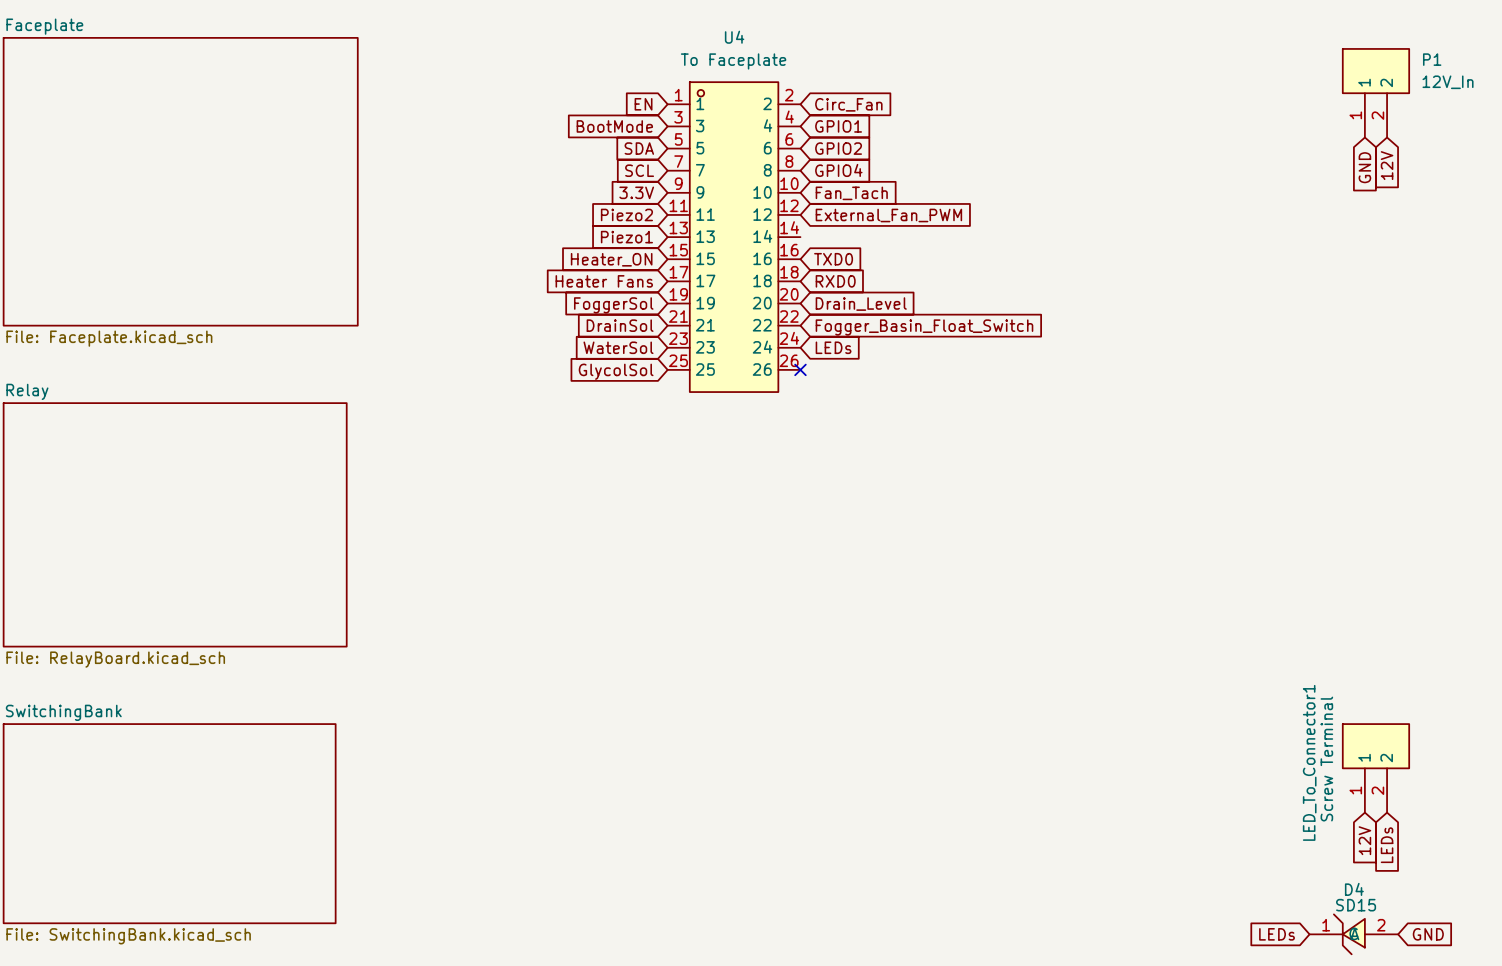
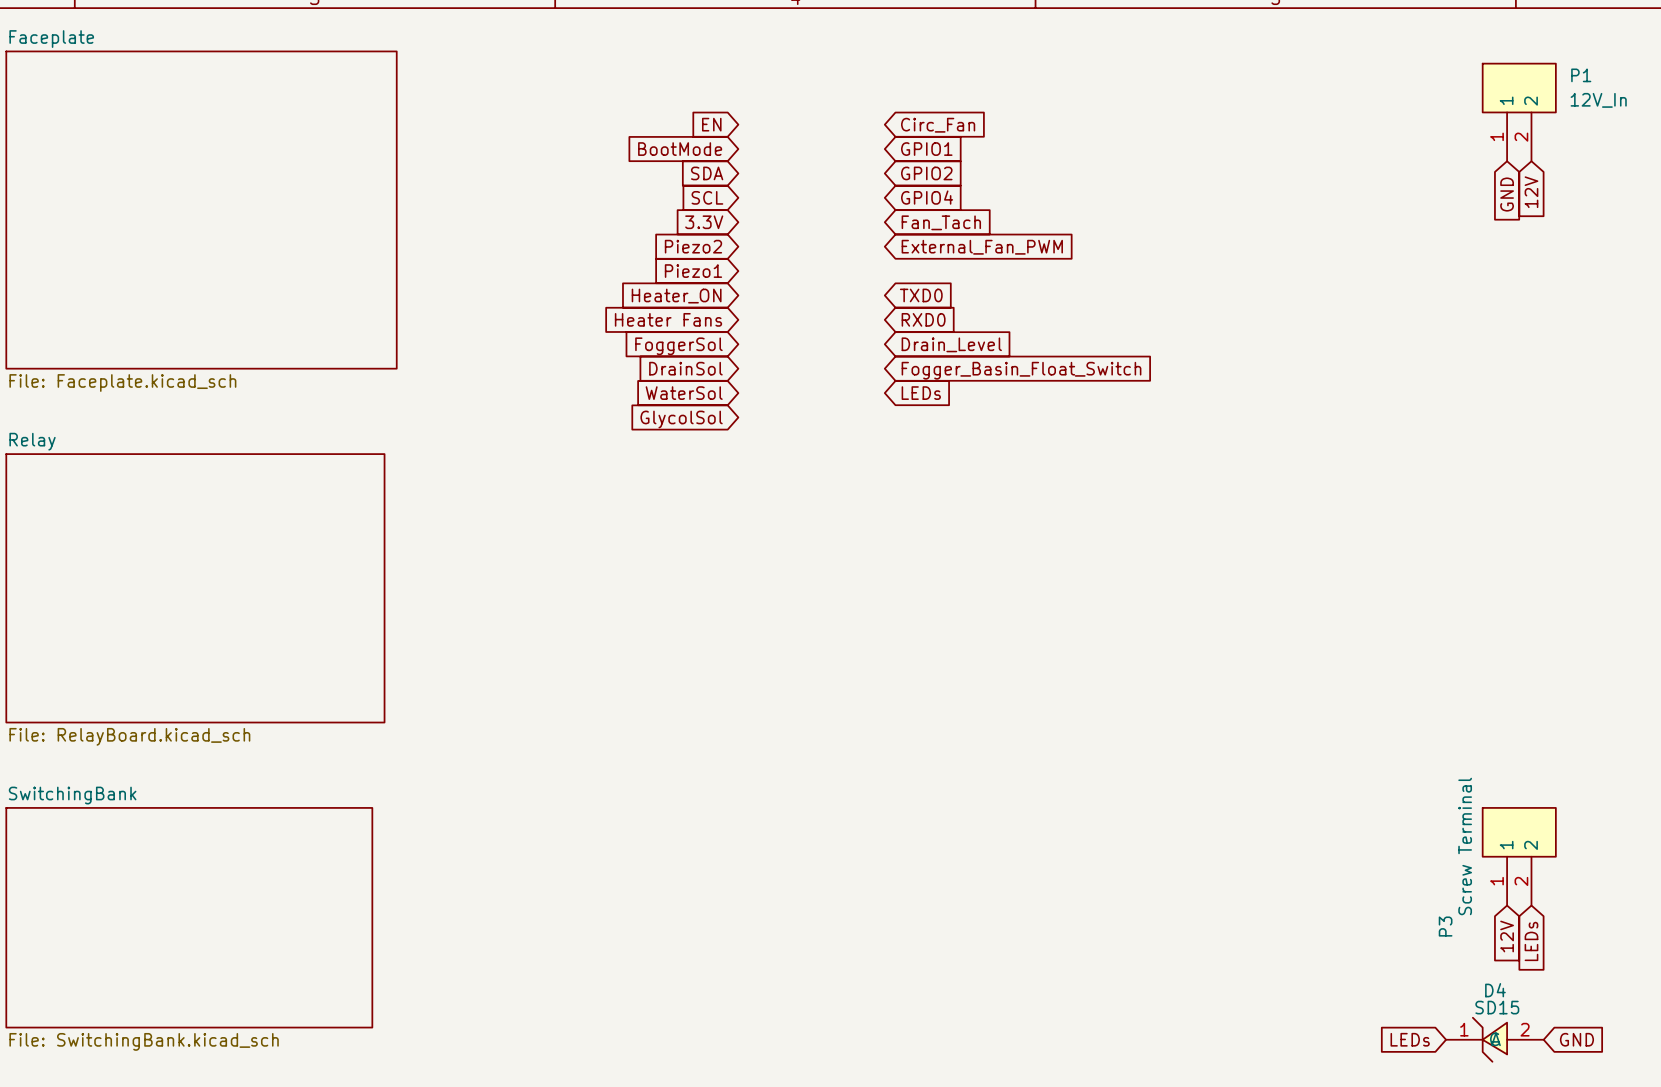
U4: To Faceplate (734, 237) -> none
no-connect mark: (800, 369) -> none
LED_To_Connector1 name: LED_To_Connector1 (1309, 762) -> P3 (1445, 926)

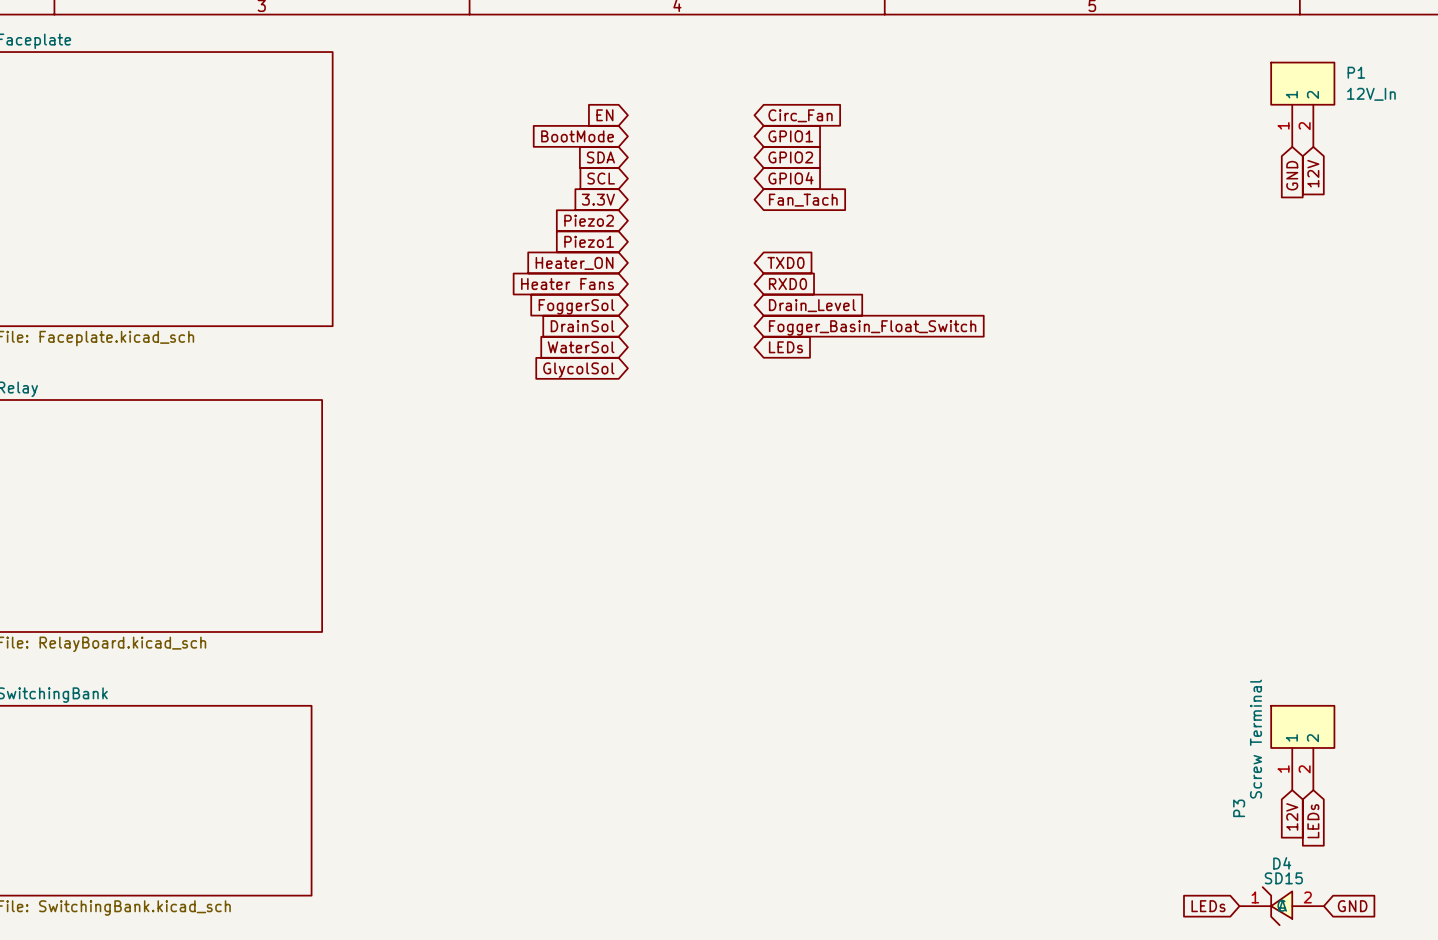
global label: External_Fan_PWM (982, 247) -> none

